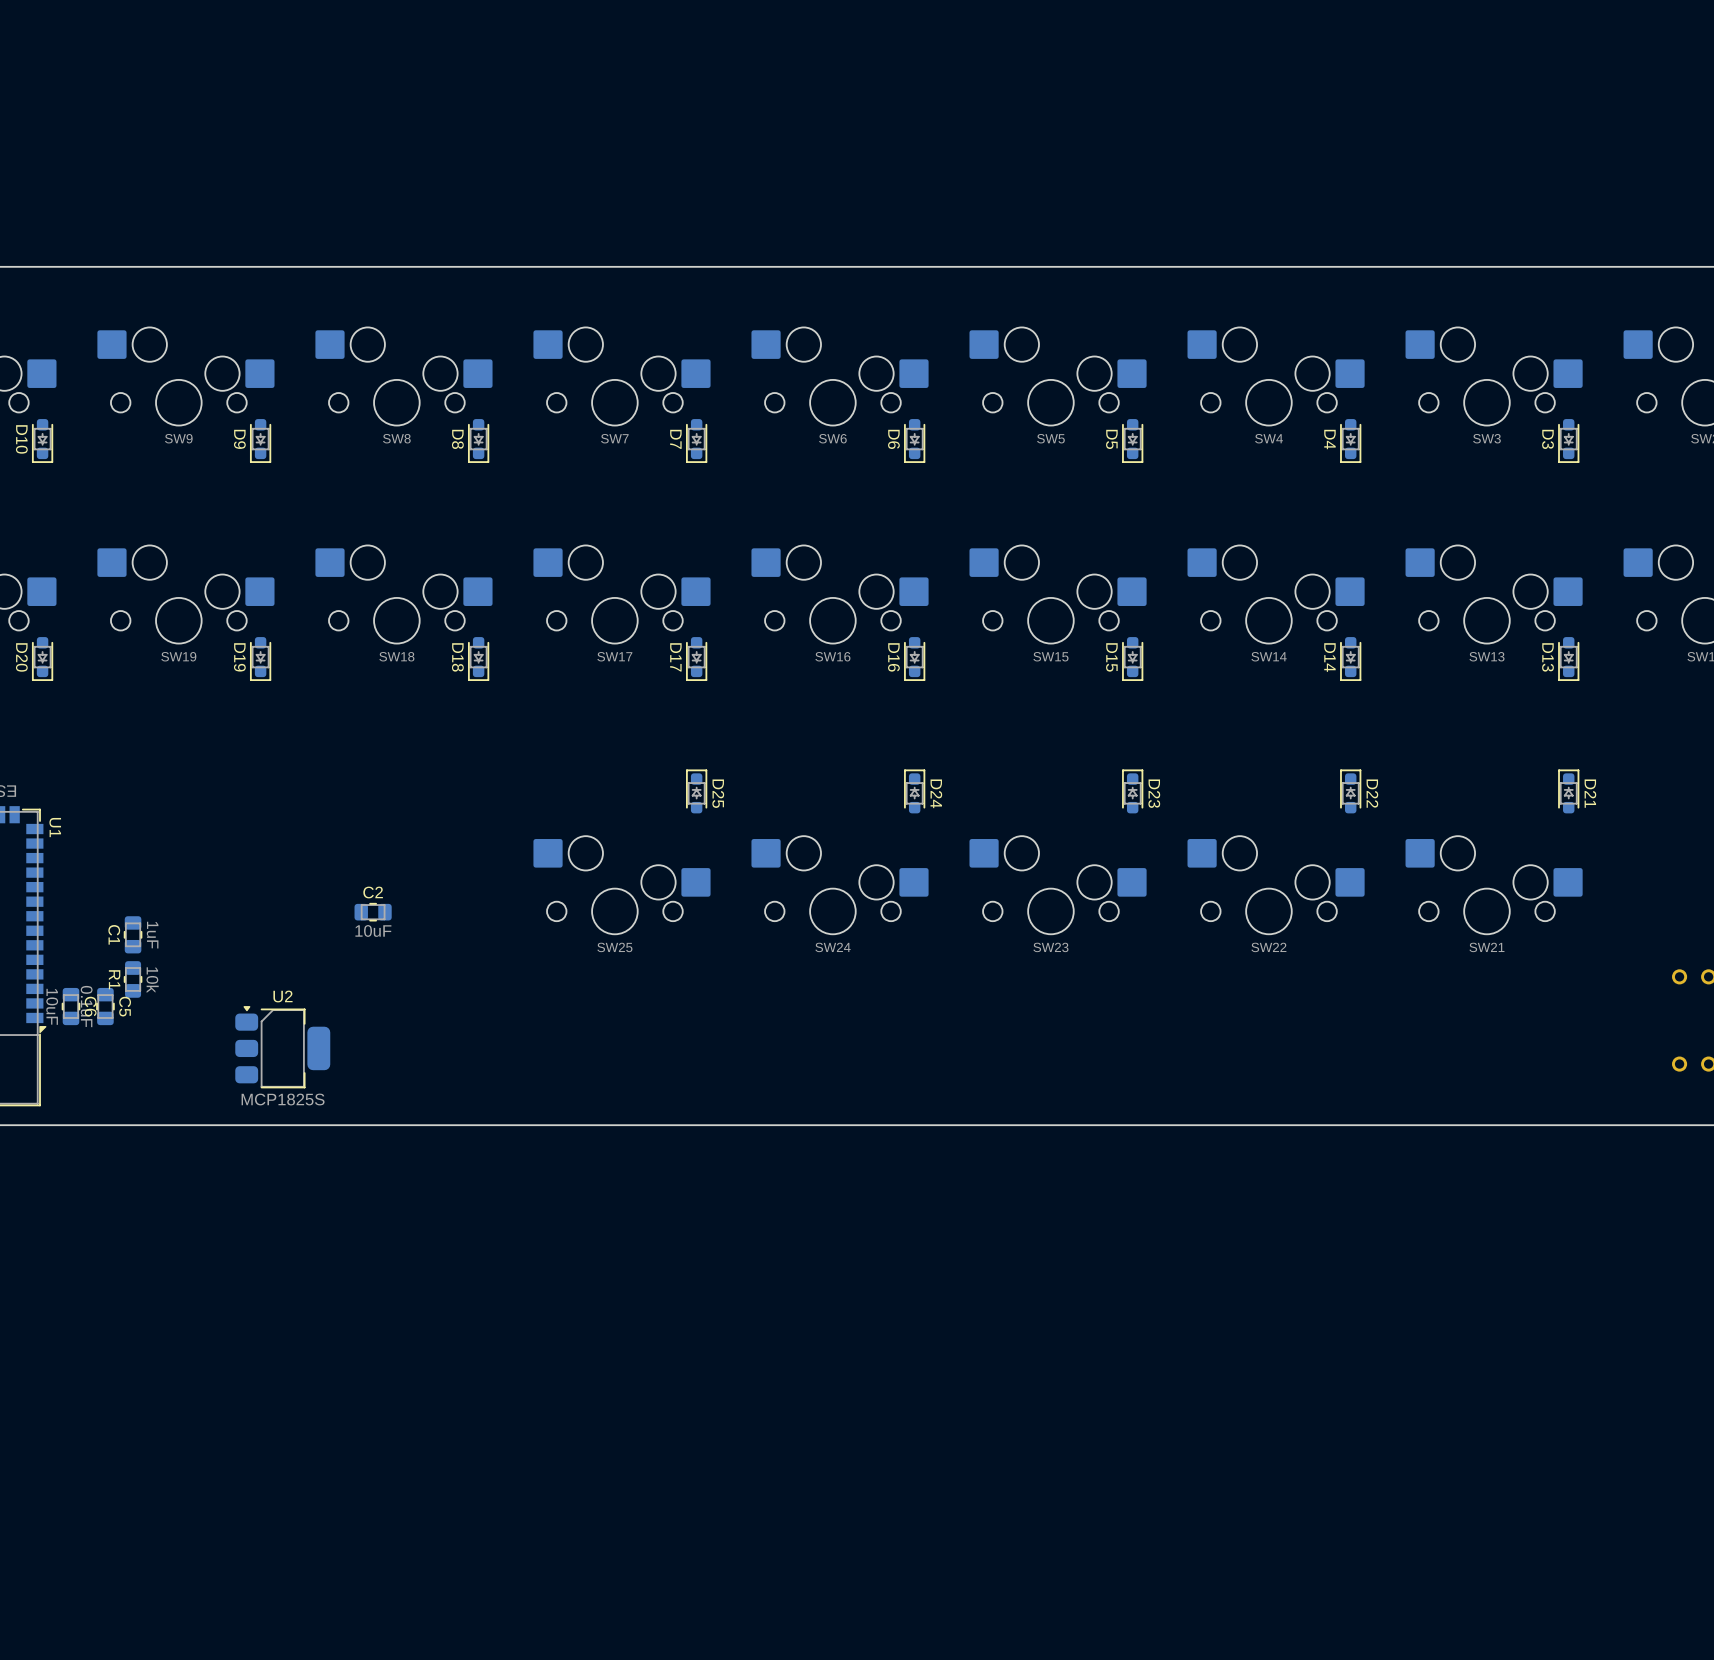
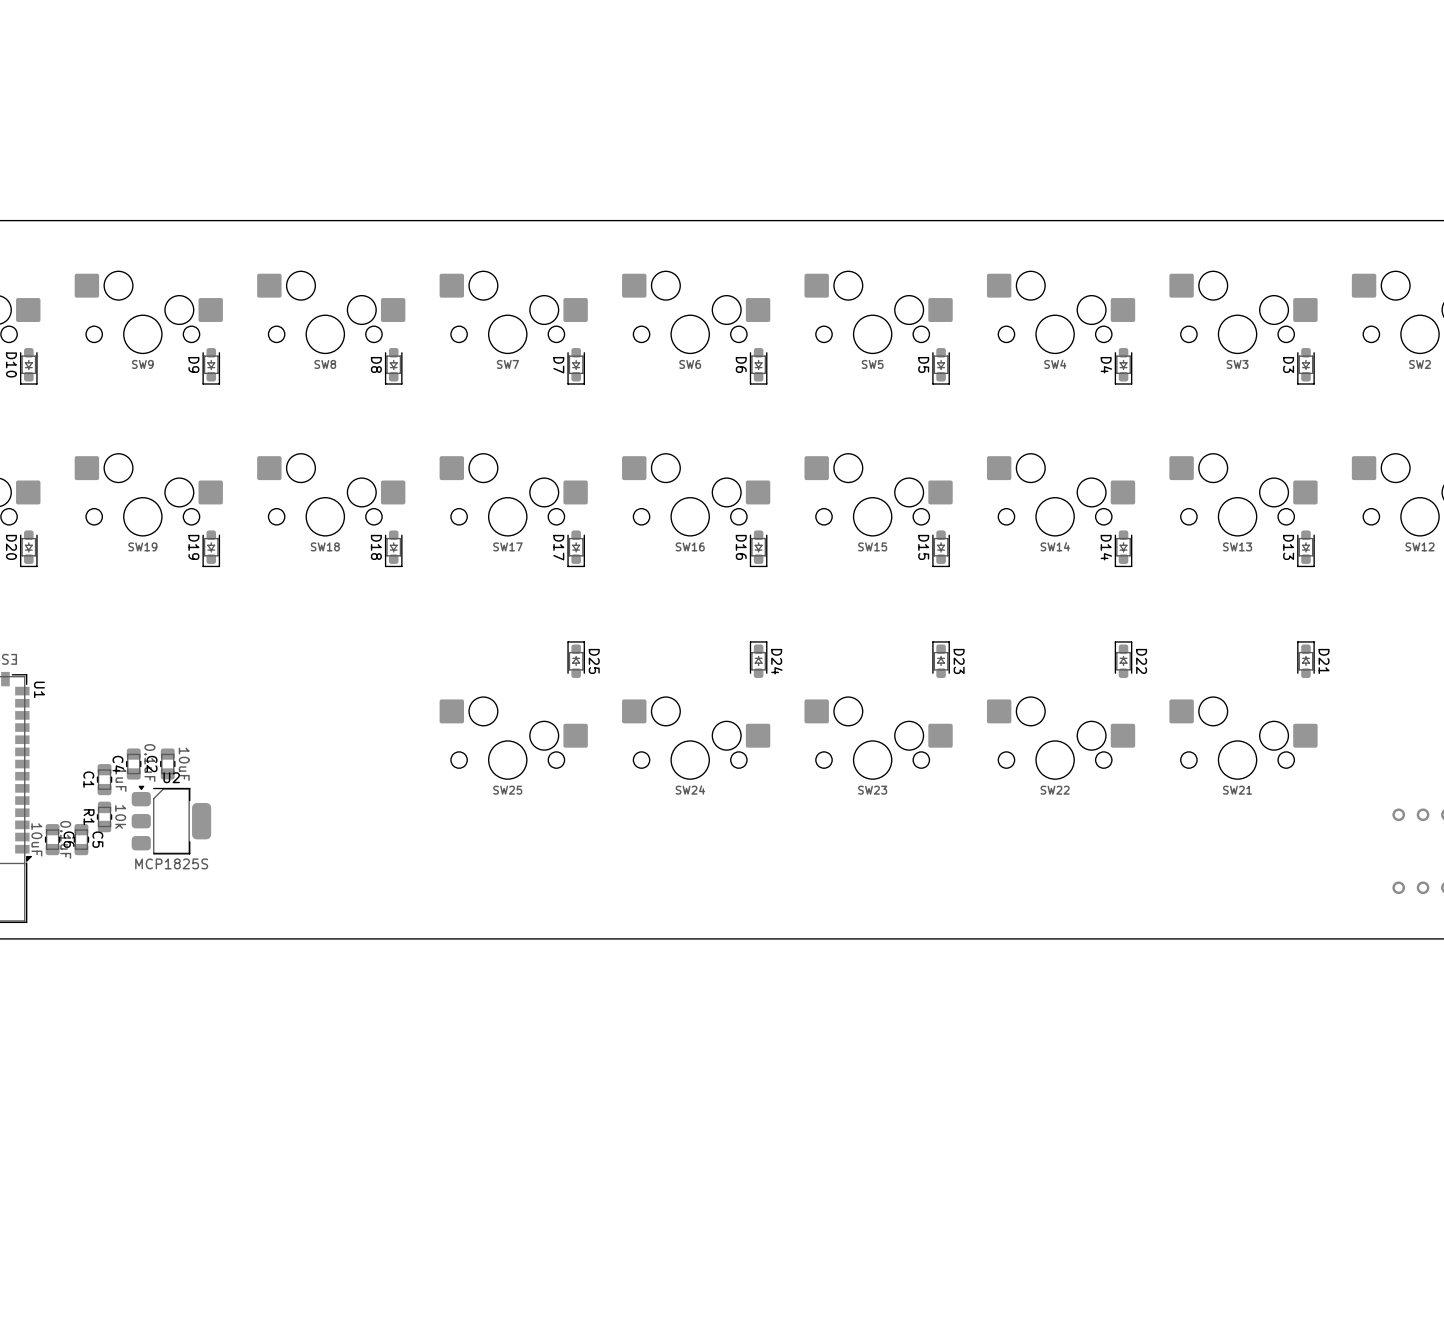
C2 name position: C2 (373, 892) -> C2 (152, 764)
C2 rotation: 0° (373, 912) -> 90° clockwise (167, 764)
C2 position: (373, 912) -> (167, 764)
C4: none -> 0.1uF (133, 764)
C2 value position: 10uF (373, 930) -> 10uF (184, 764)
U2 position: (282, 1047) -> (171, 820)

